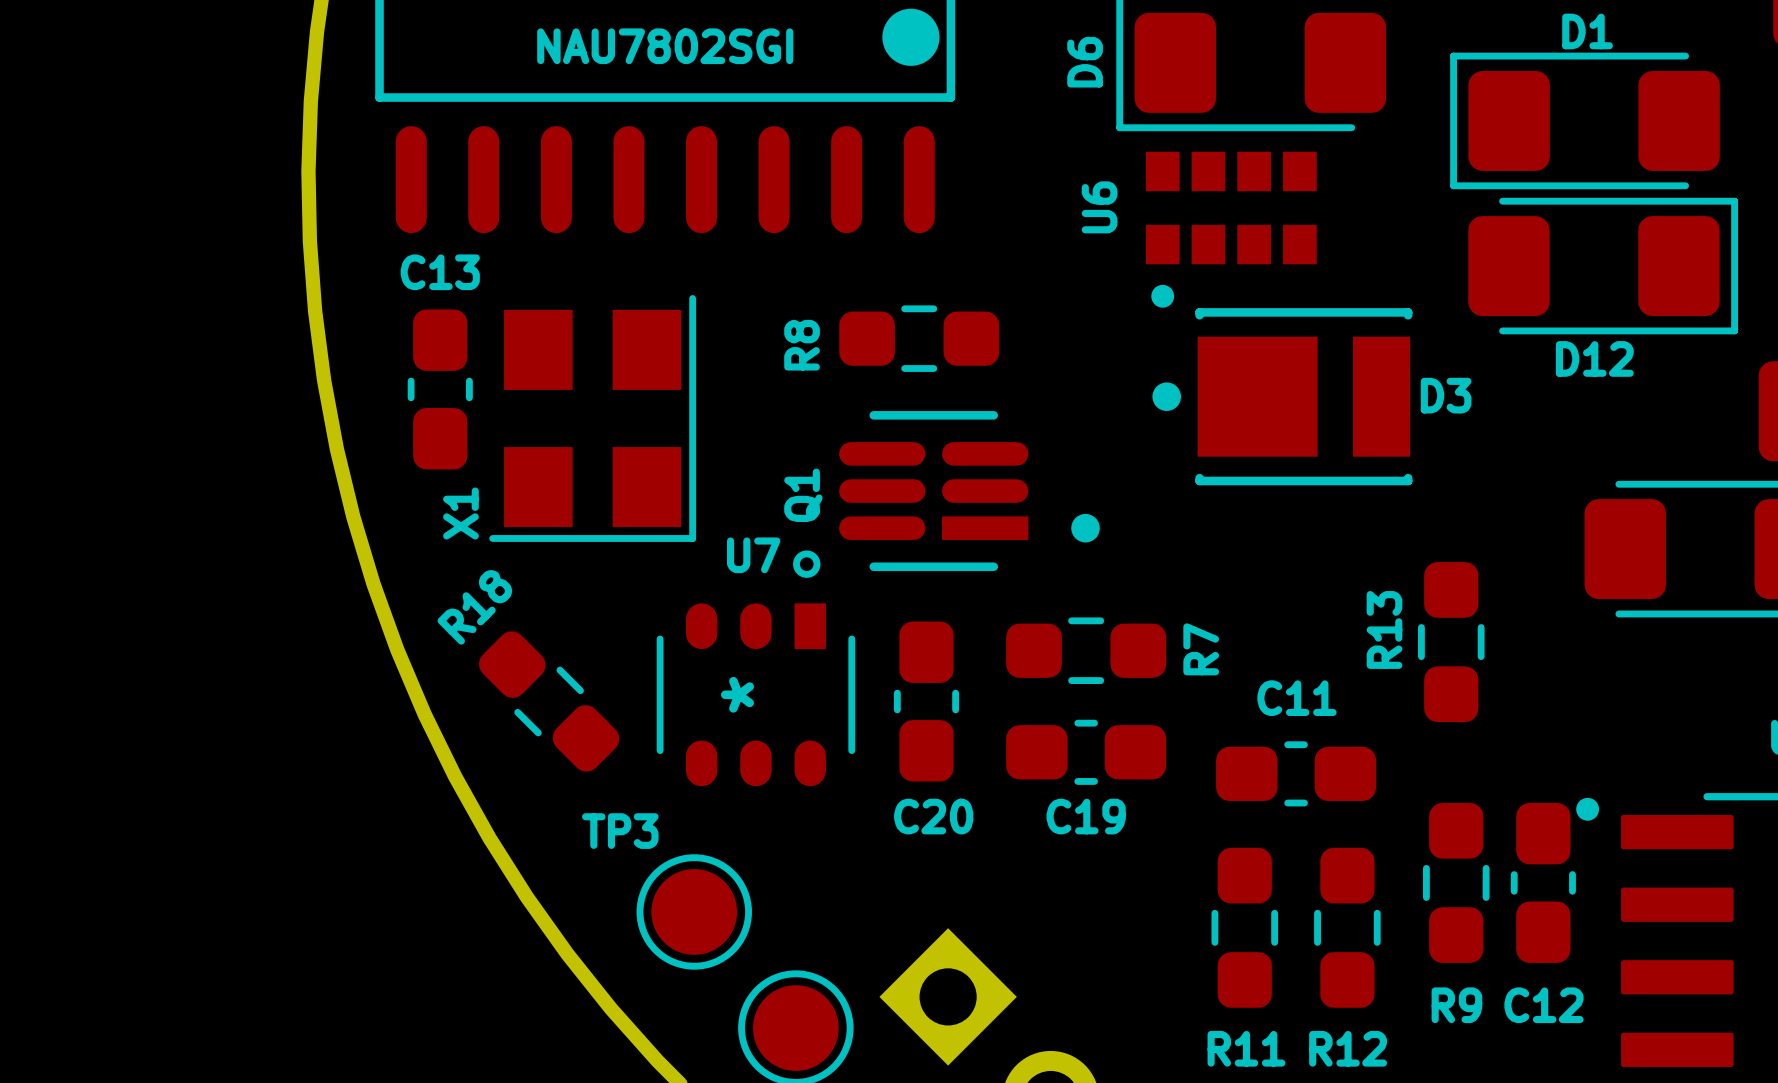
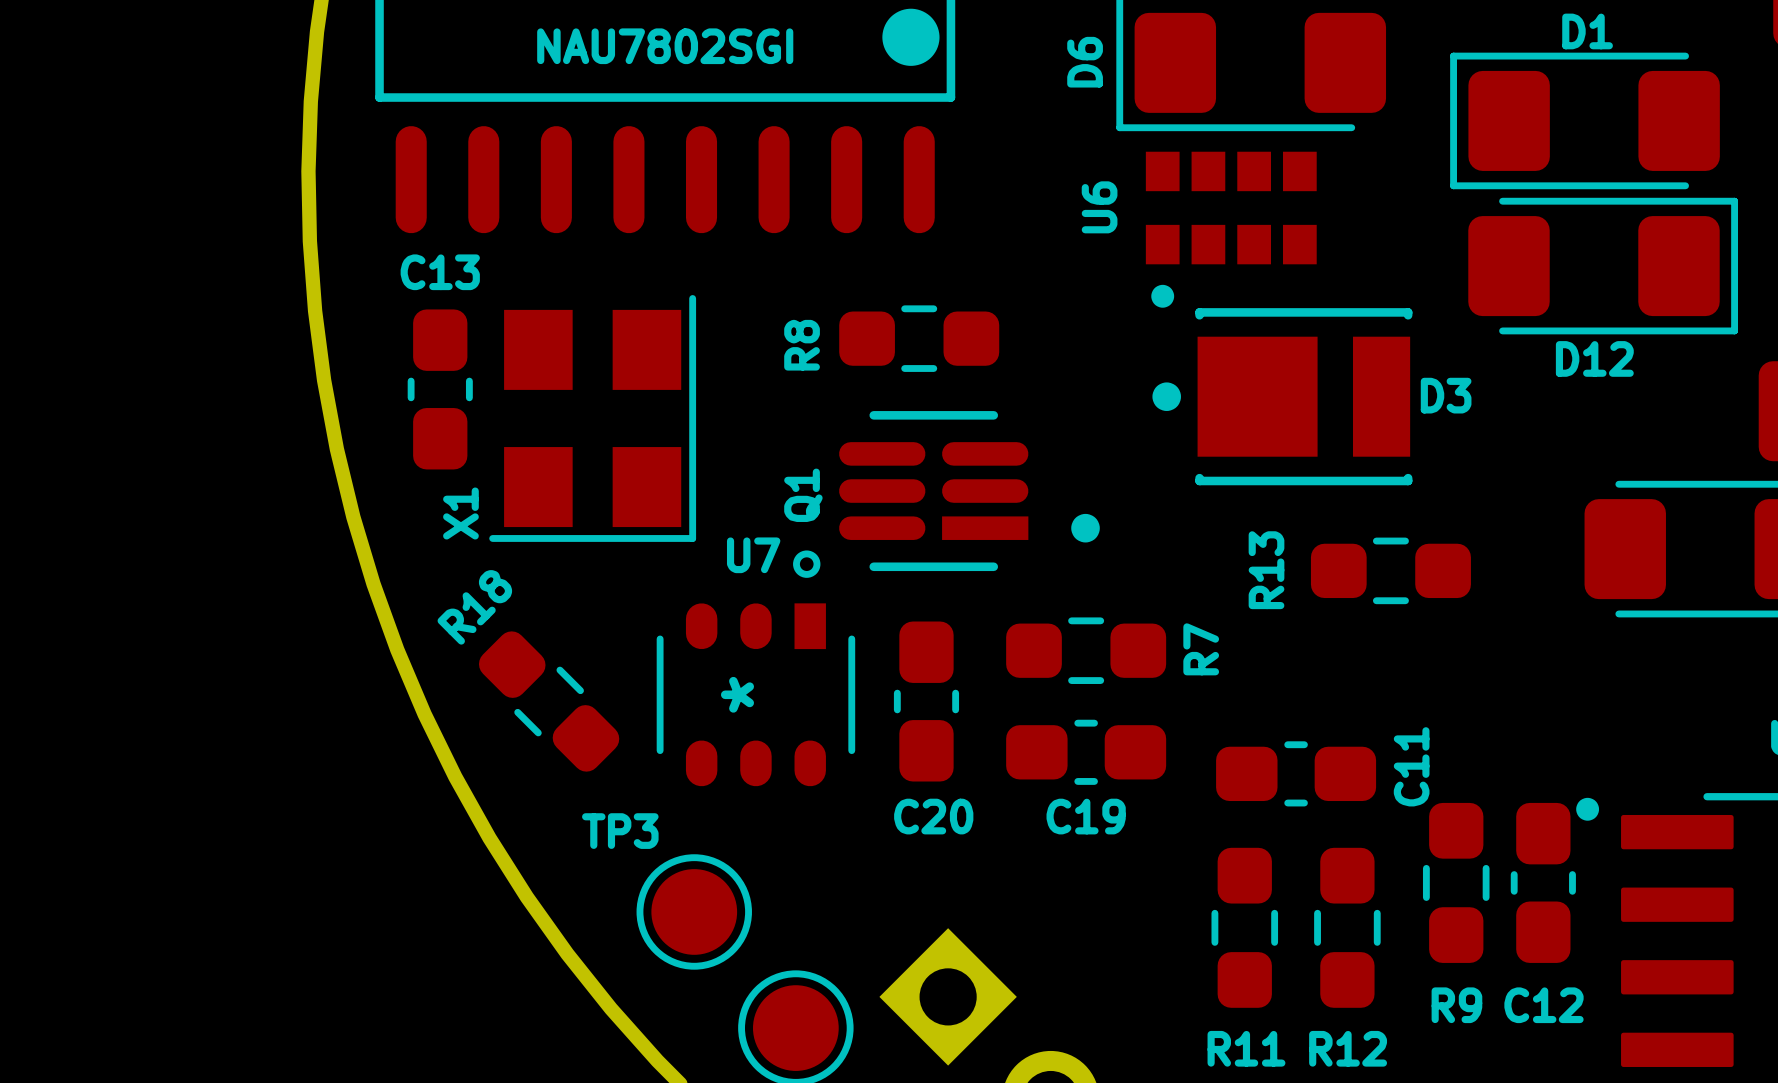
R13 rotation: 0° (1451, 642) -> 90° clockwise (1390, 570)
C11 name rotation: 0° (1297, 698) -> 90° counterclockwise (1411, 766)
C11 name position: C11 (1297, 698) -> C11 (1411, 766)

